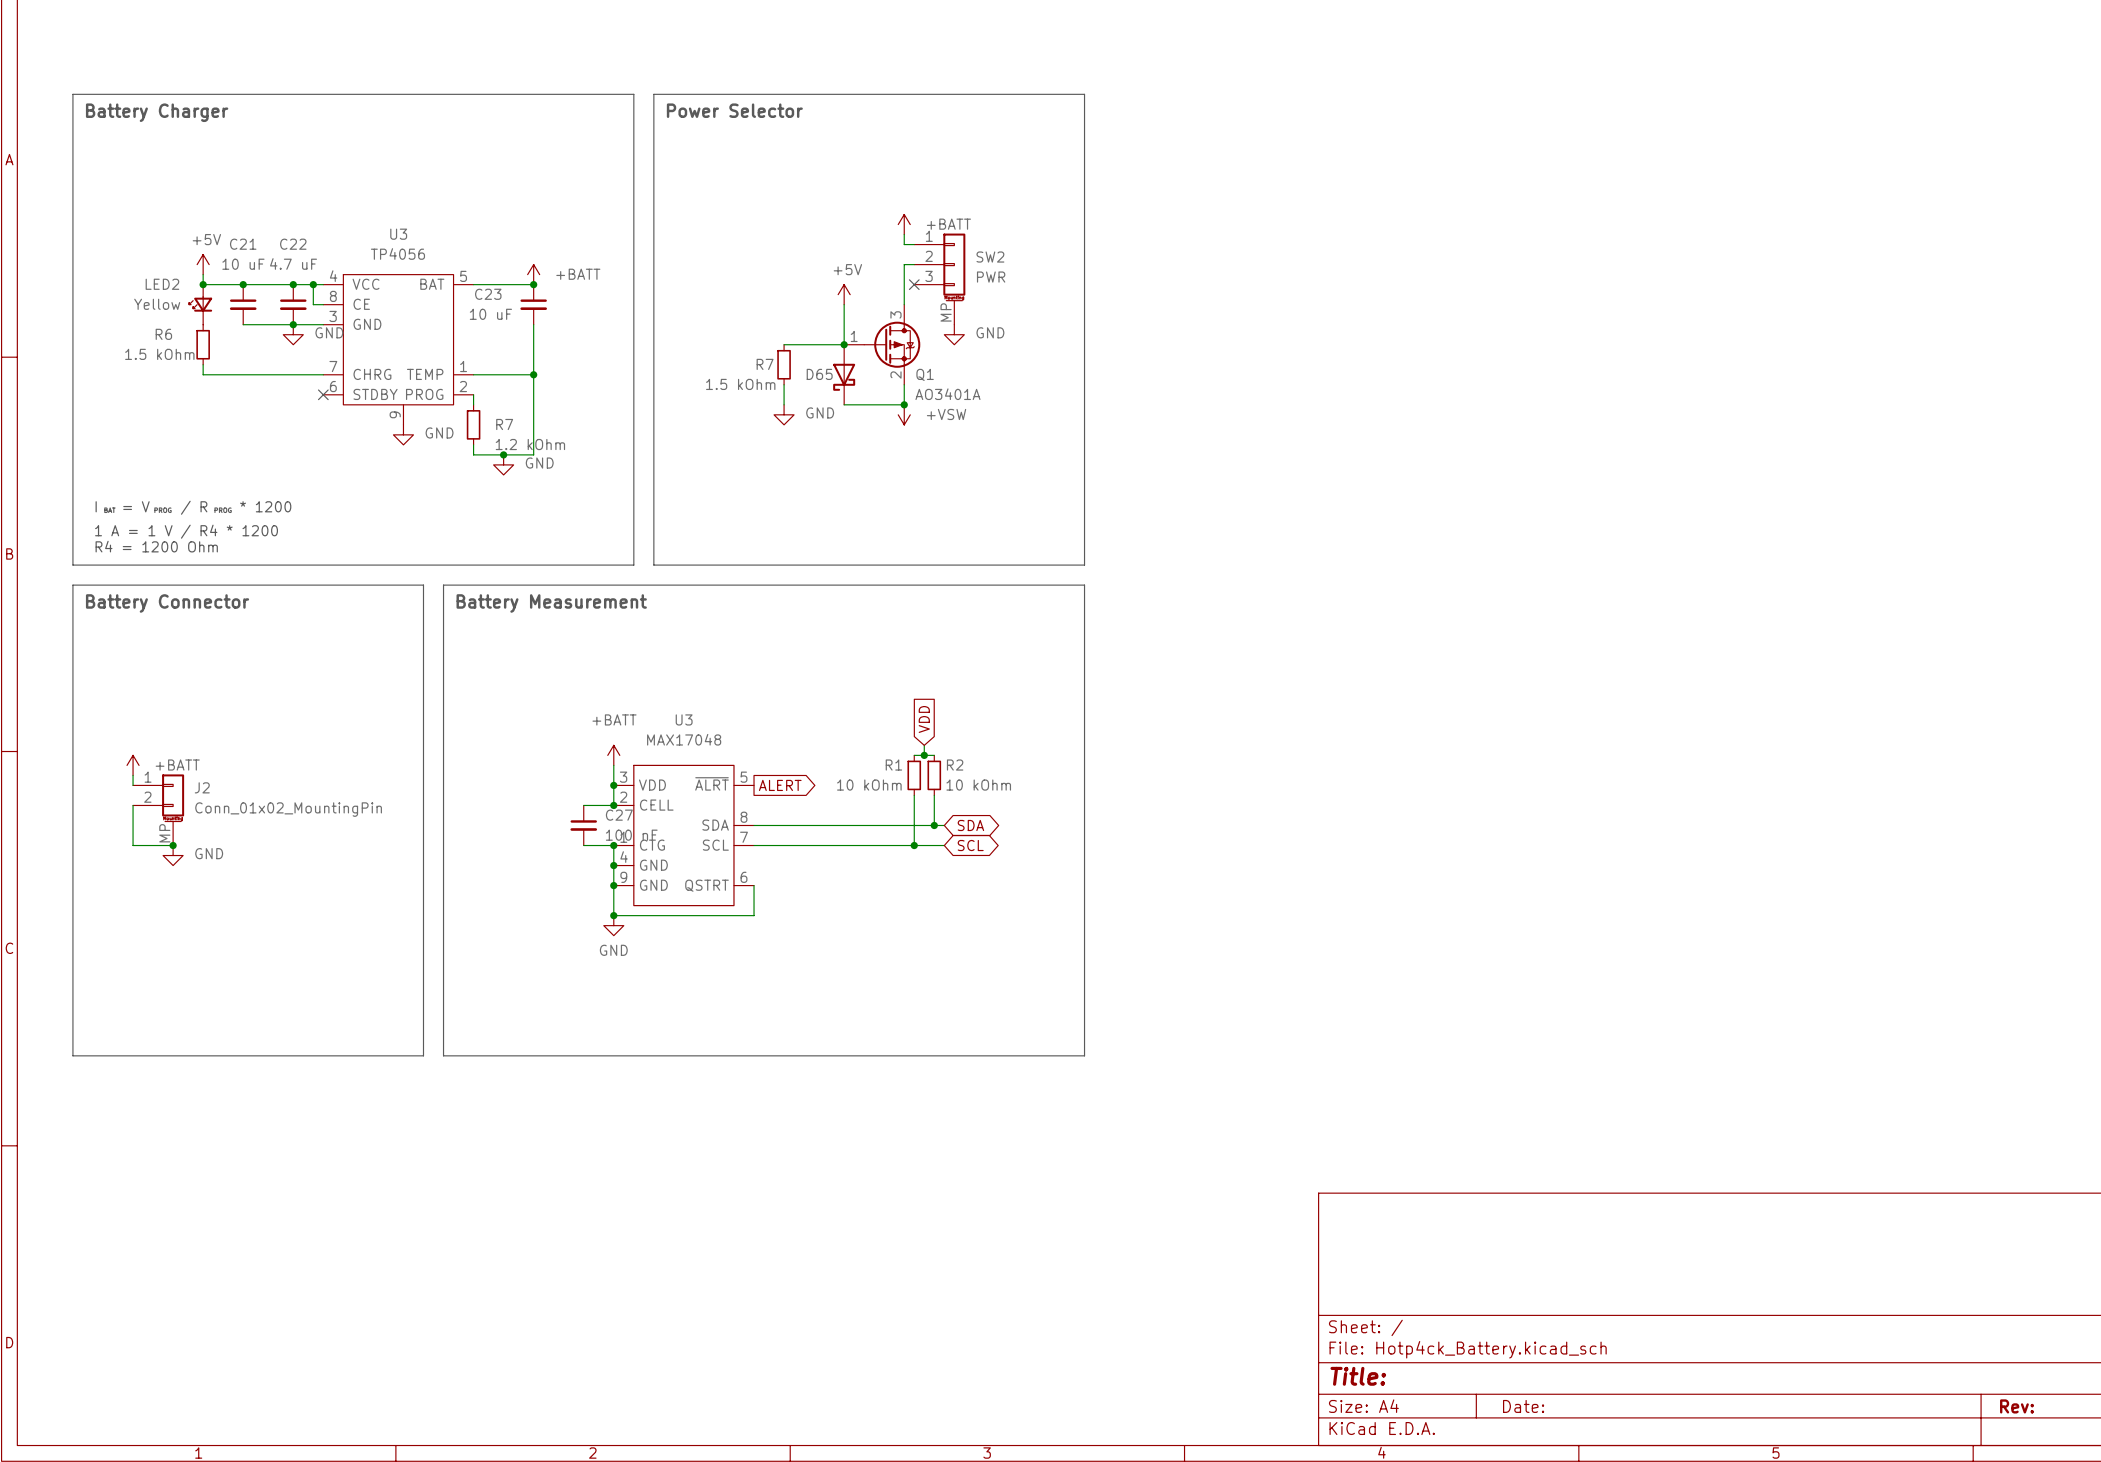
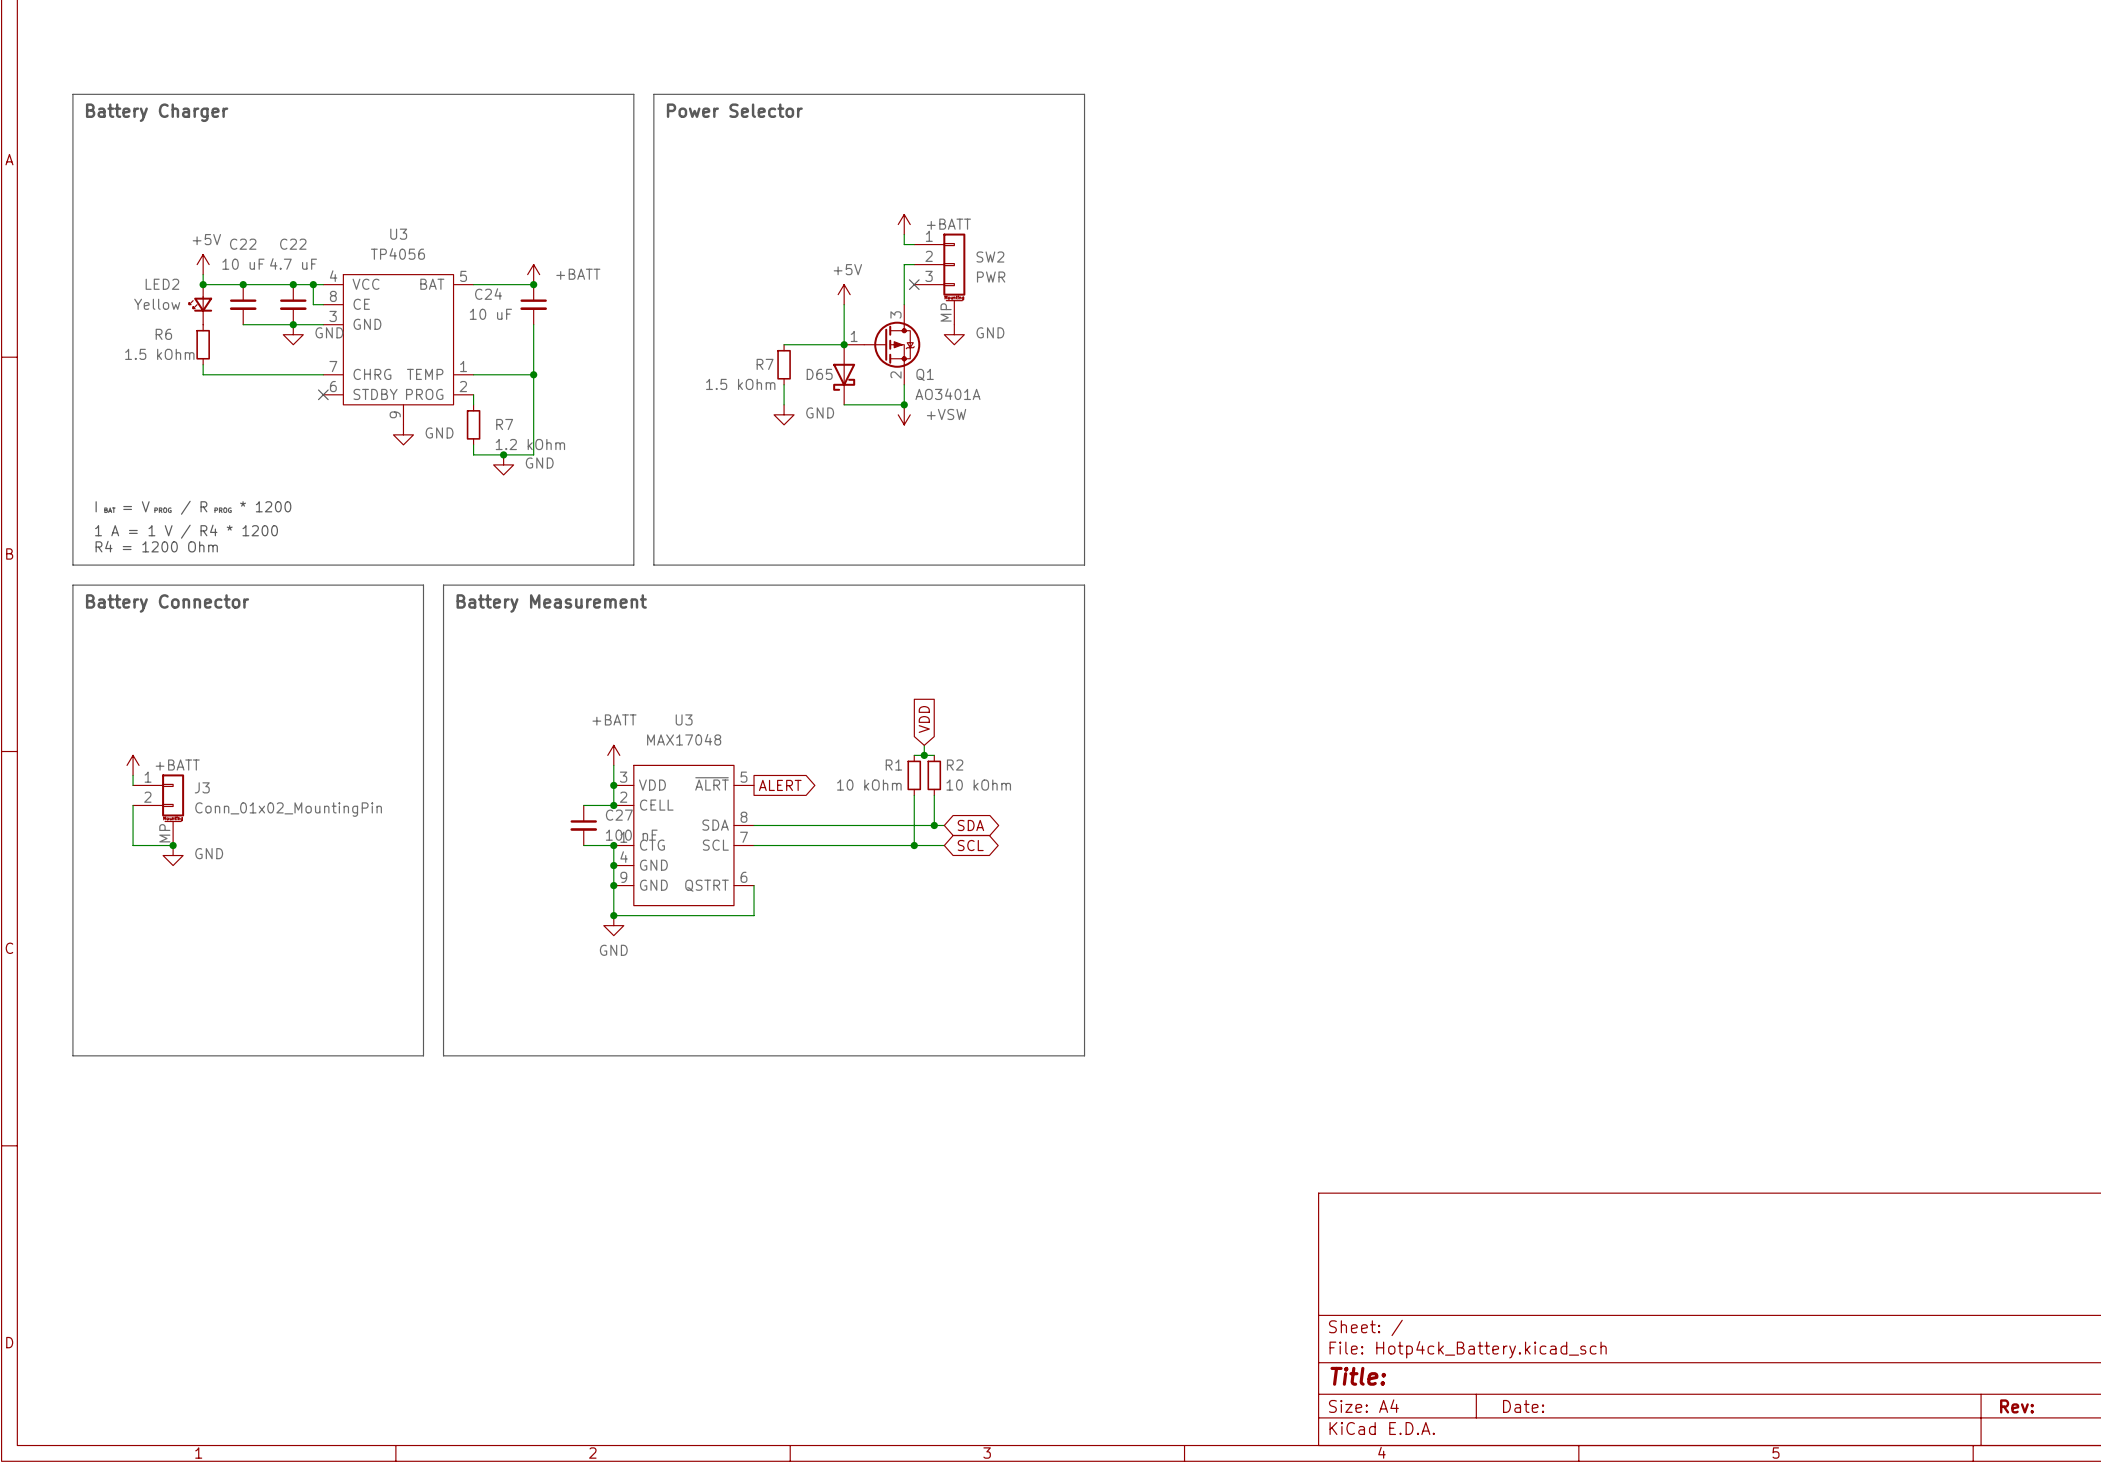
C21 name: C21 (243, 244) -> C22 (243, 244)
C23 name: C23 (488, 294) -> C24 (488, 294)
J2 name: J2 (202, 787) -> J3 (202, 787)

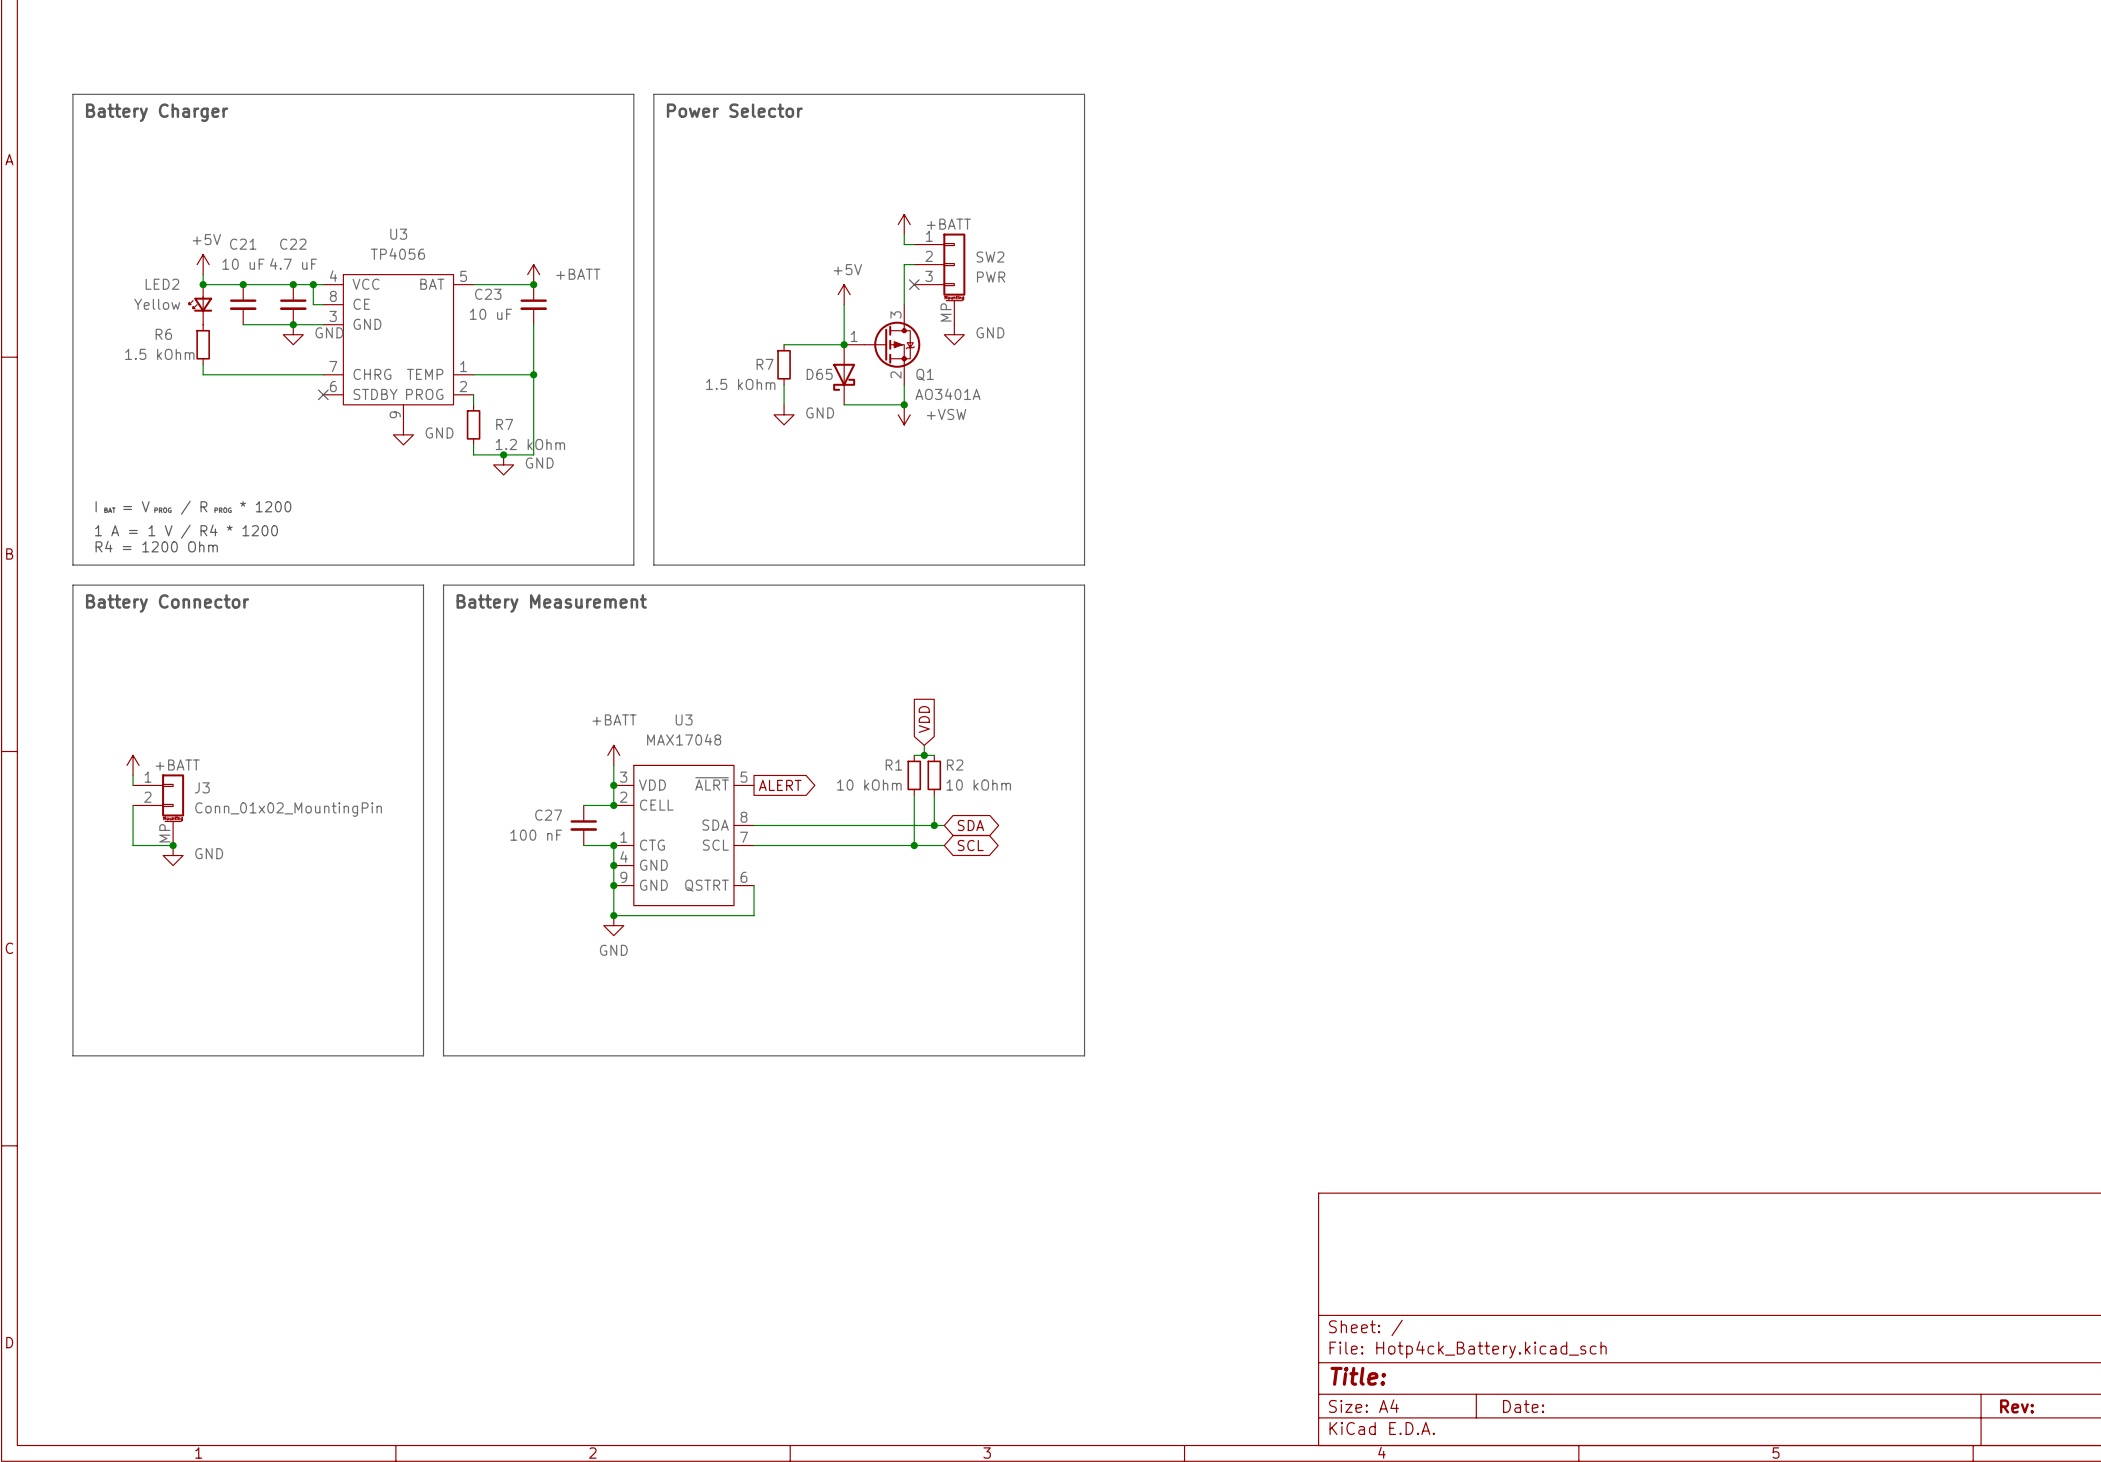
C22 name: C22 (243, 244) -> C21 (243, 244)
C24 name: C24 (488, 294) -> C23 (488, 294)
C27 name position: C27 (619, 815) -> C27 (548, 815)
C27 value position: 100 nF (631, 835) -> 100 nF (536, 835)

